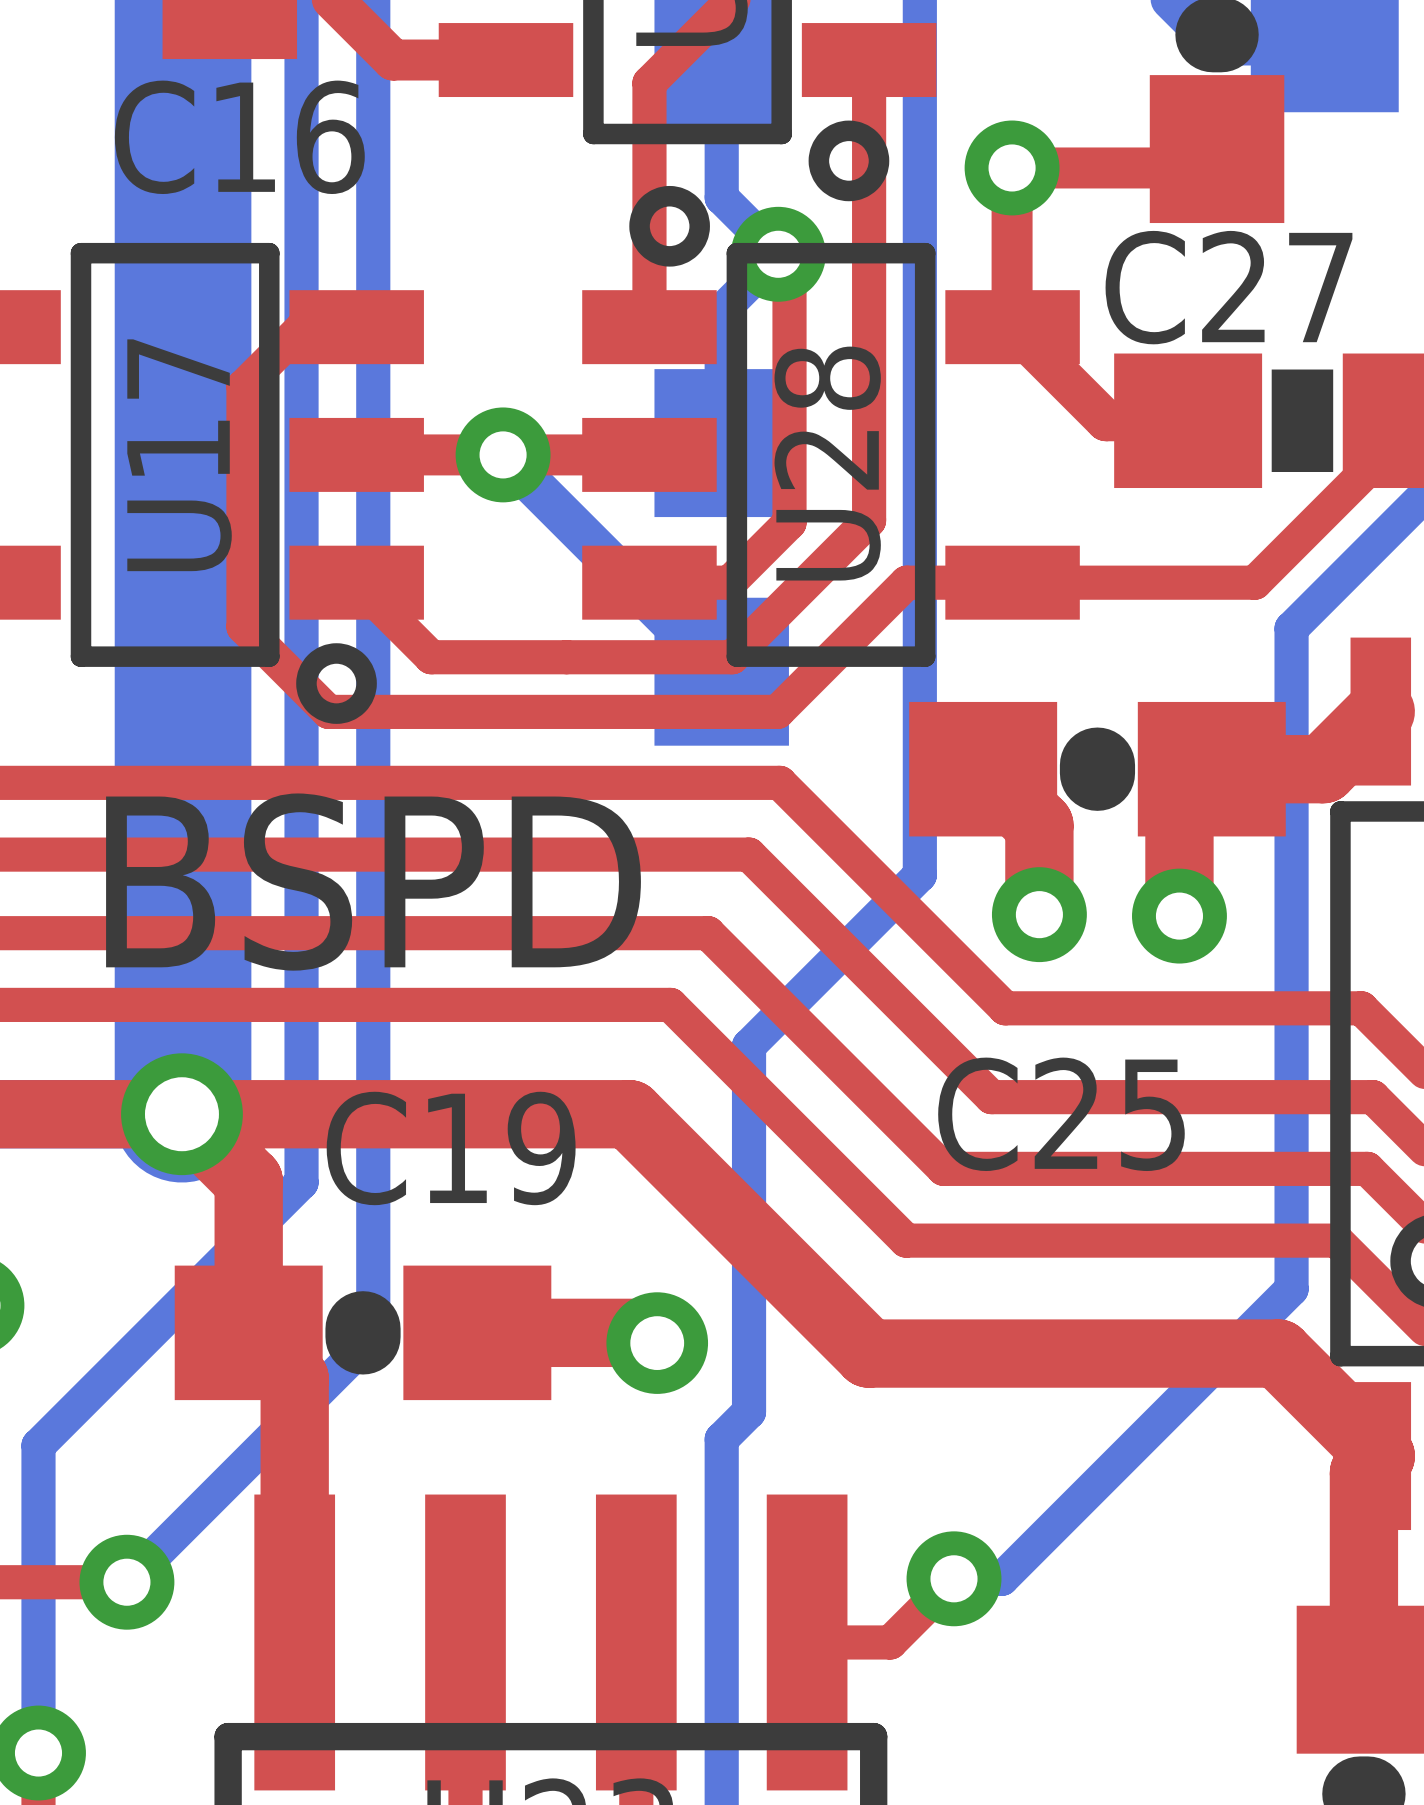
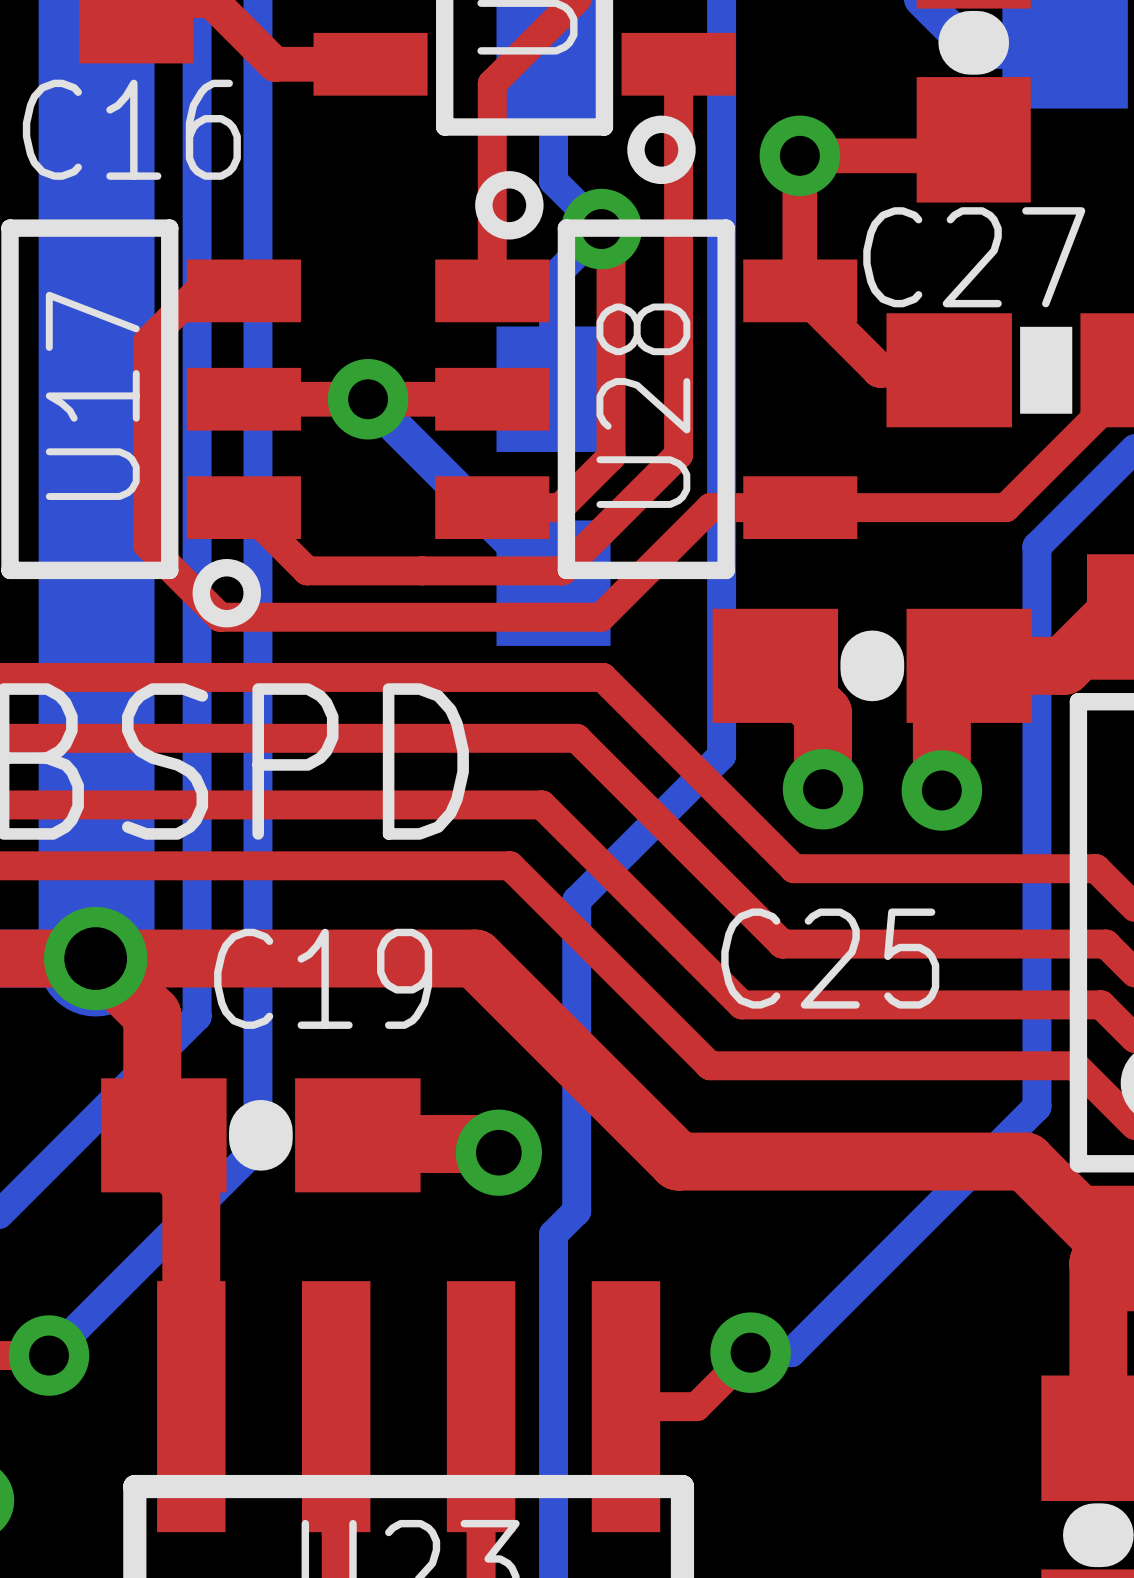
C19 position: (363, 1332) -> (260, 1135)

